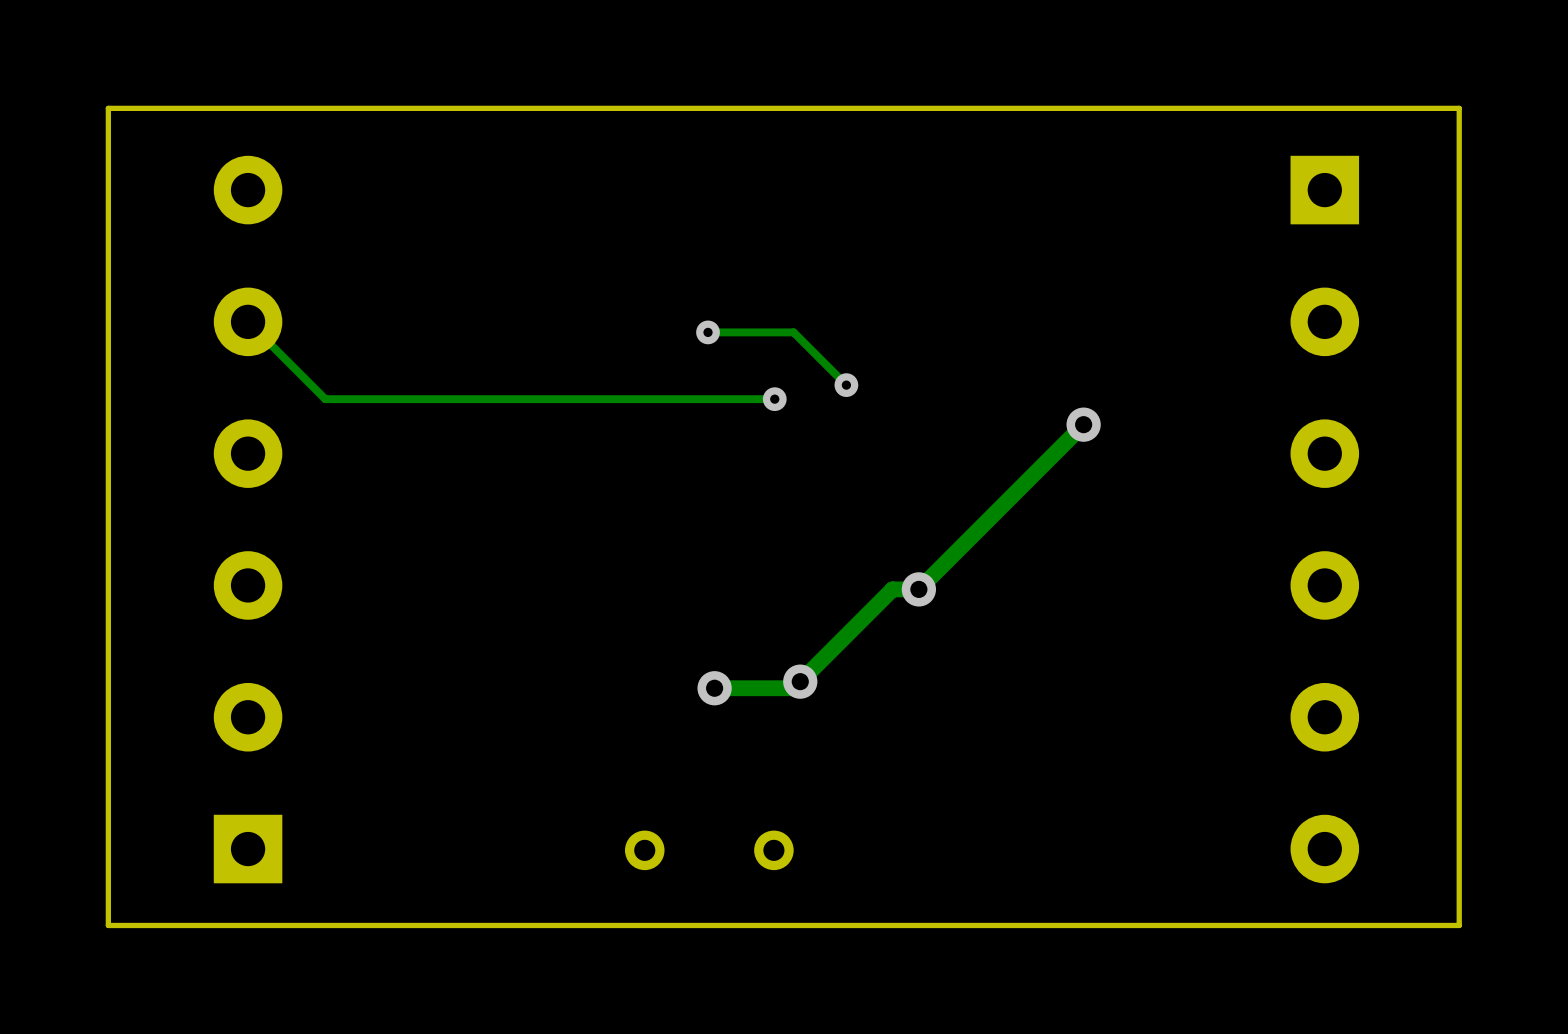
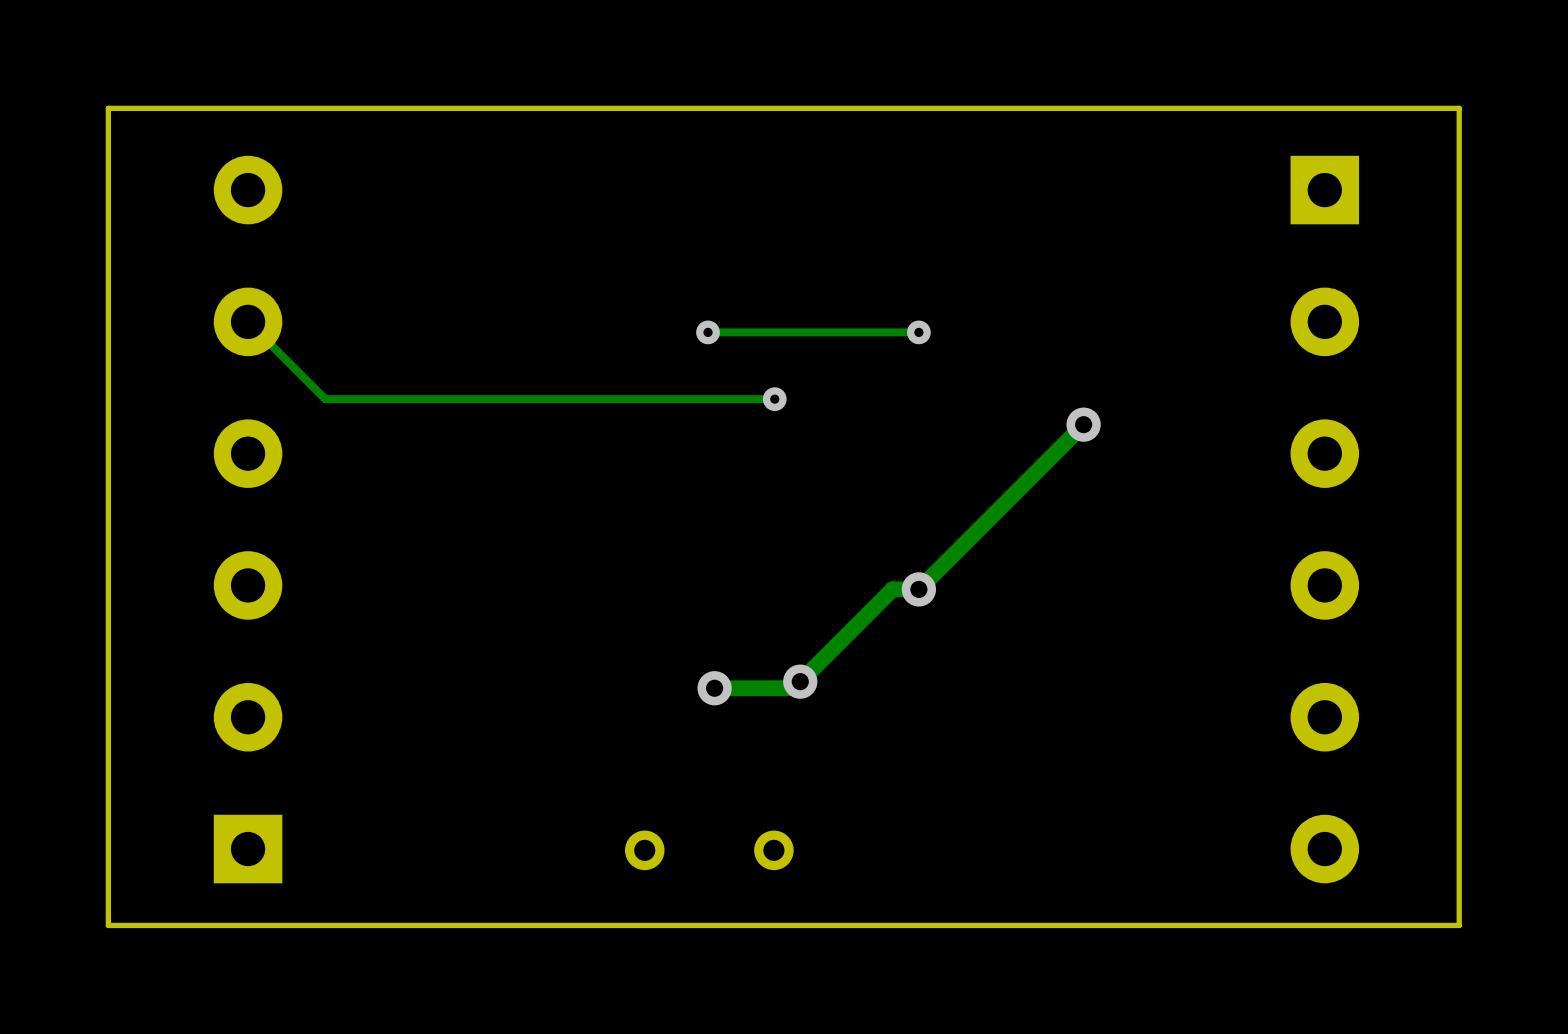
track: (793, 332) (846, 385) -> (793, 332) (918, 332)
via position: (846, 385) -> (918, 332)

